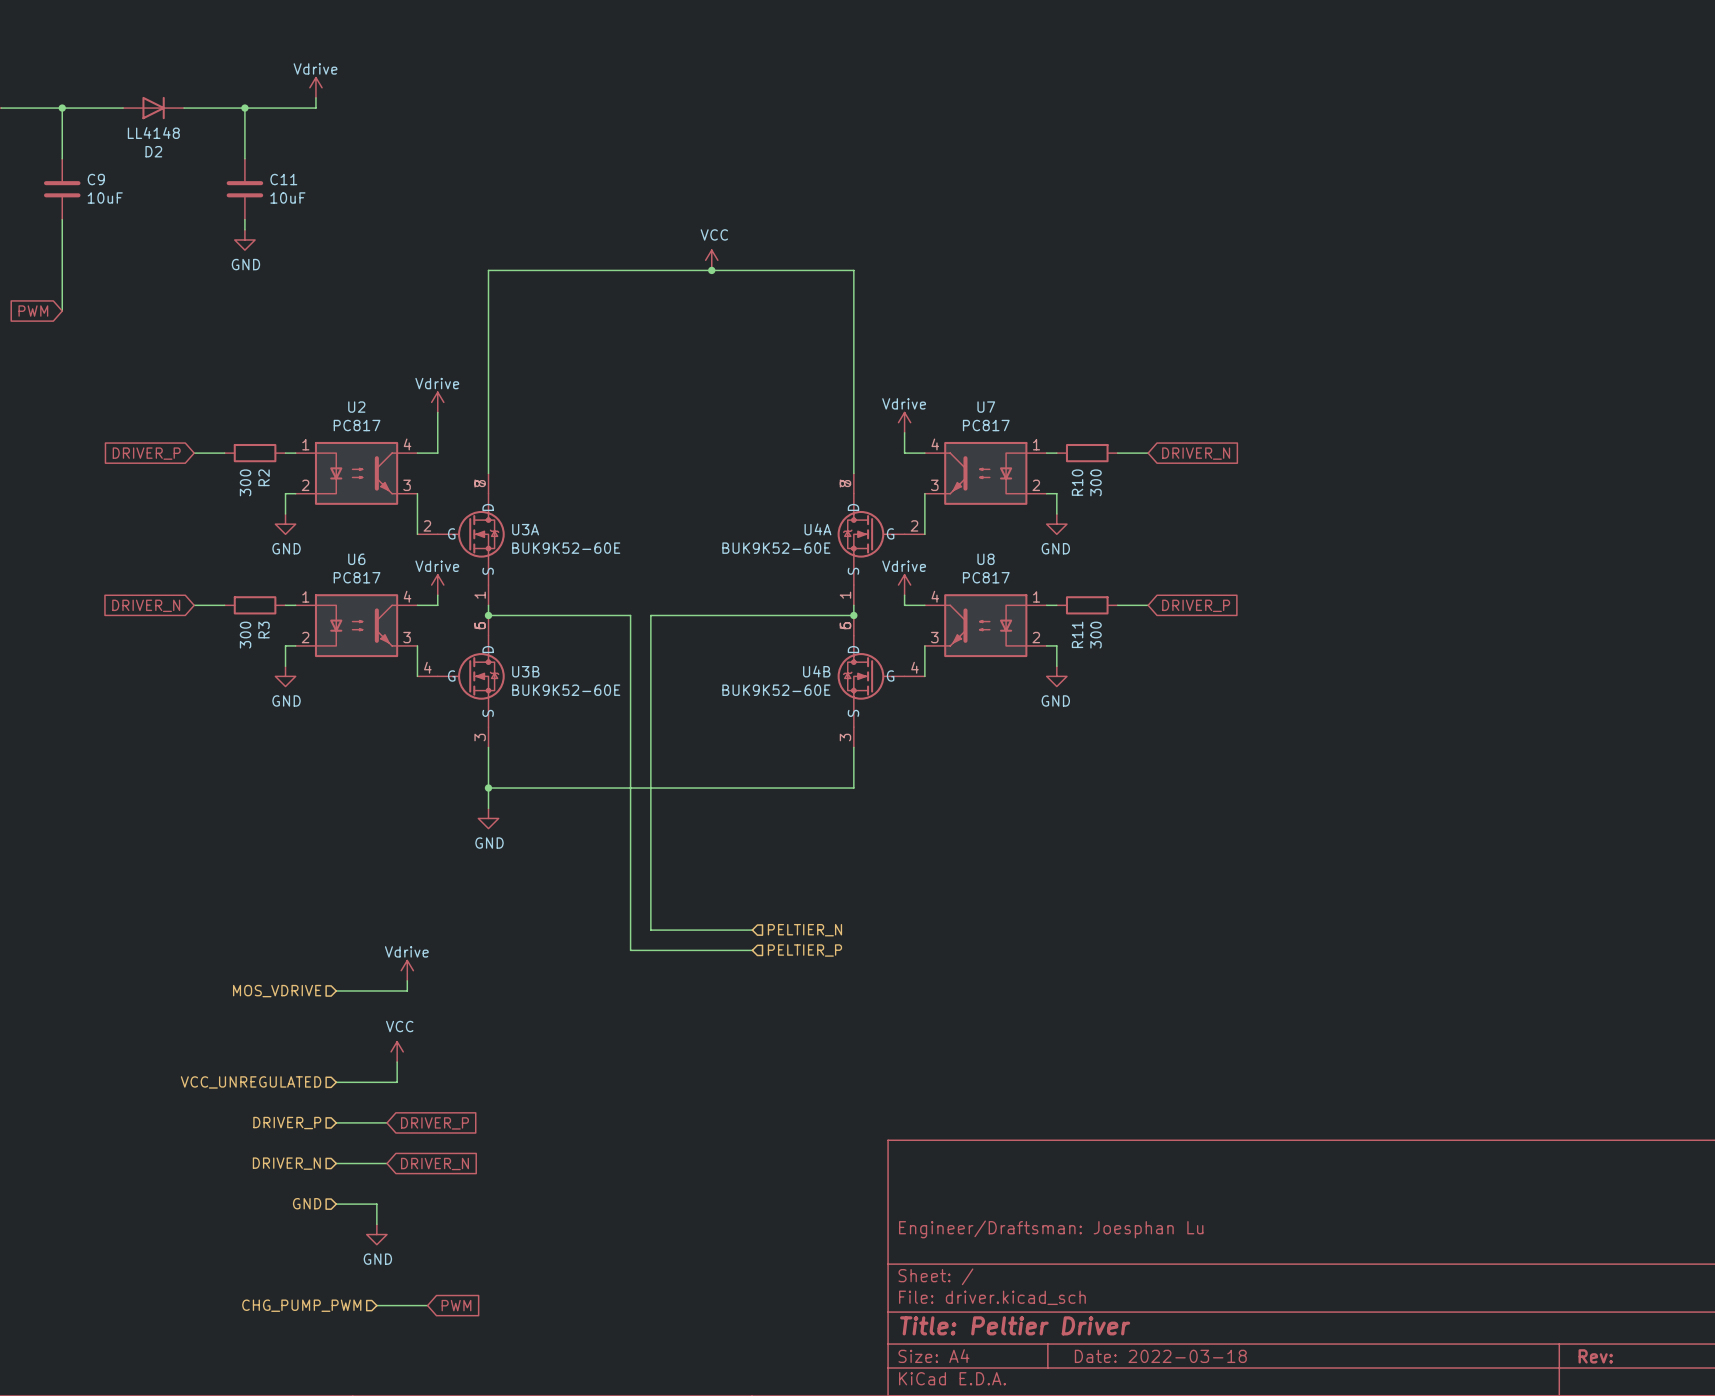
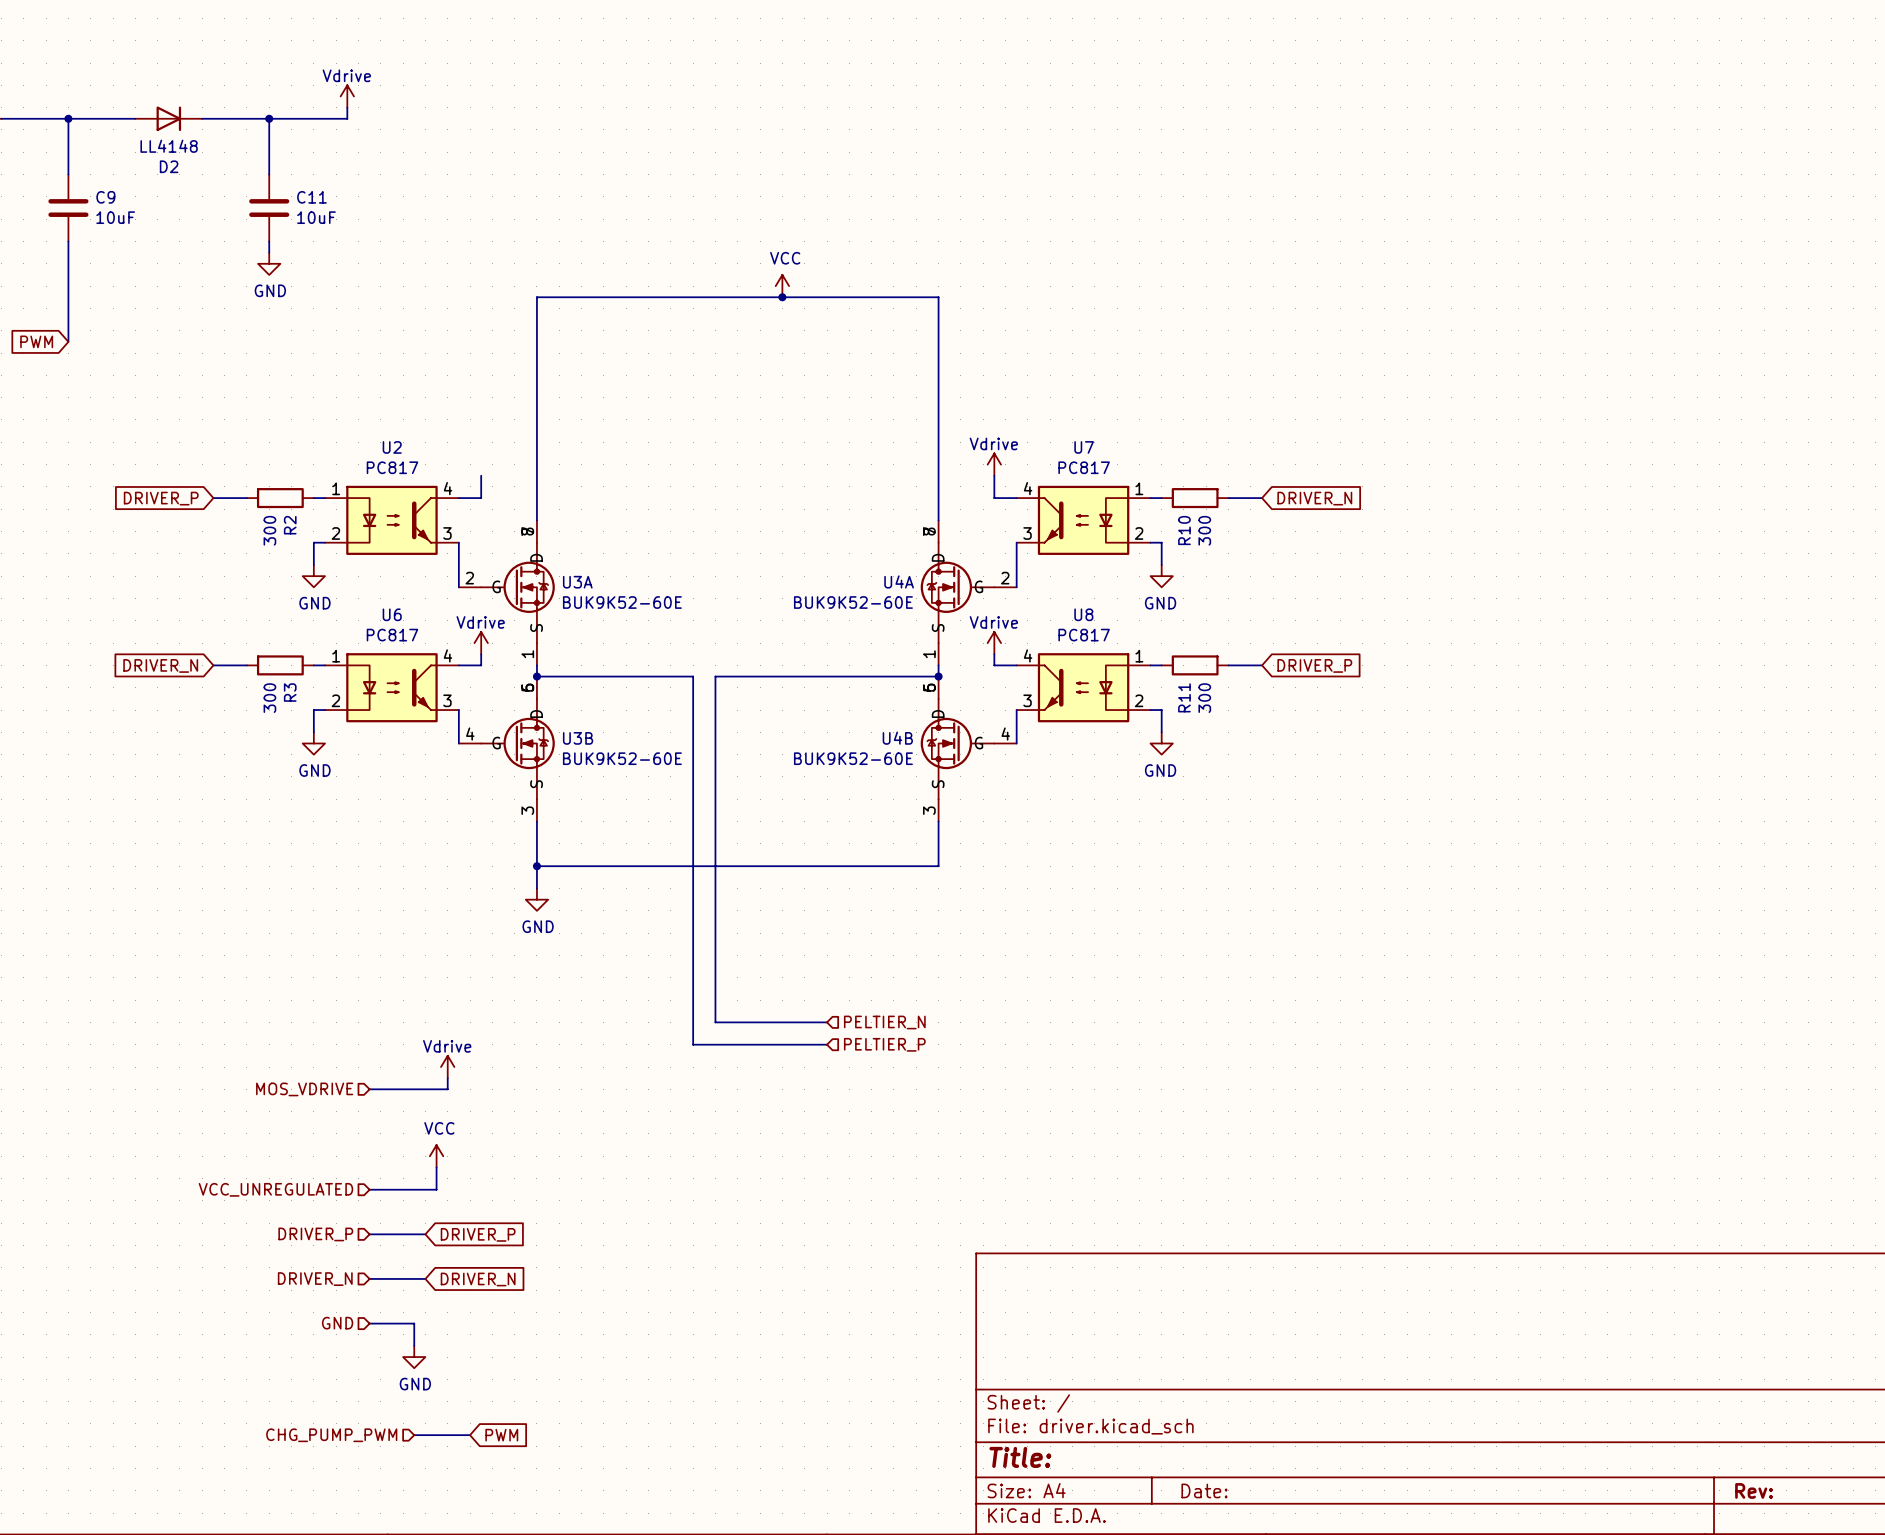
power symbol: Vdrive (437, 402) -> none
wire: (437, 412) (437, 432) -> none
title block: Engineer/Draftsman: Joesphan Lu (1051, 1229) -> none
title block: Title: Peltier Driver (1015, 1325) -> Title: (1020, 1457)
title block: Date: 2022-03-18 (1160, 1356) -> Date: (1204, 1490)

